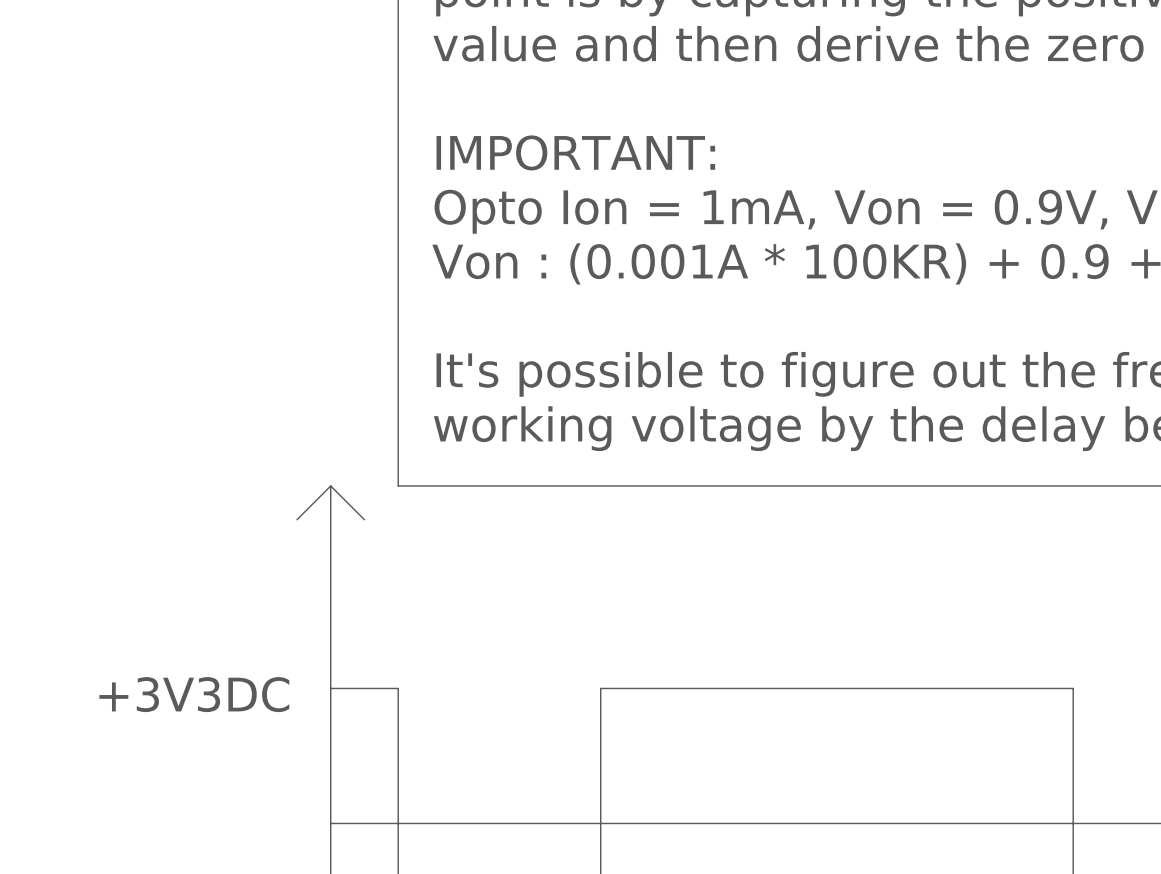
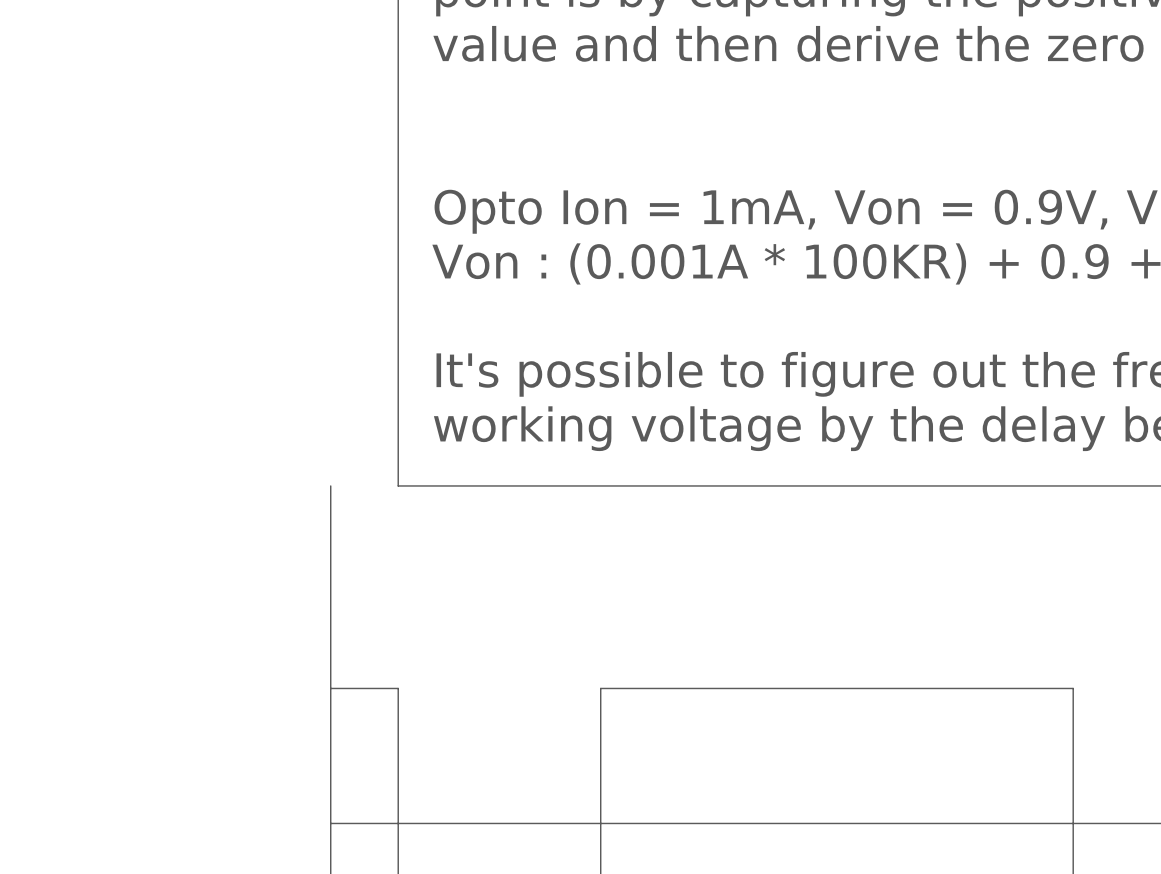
text: IMPORTANT: (575, 152) -> none
line: (296, 519) (330, 485) (364, 519) -> none
text: +3V3DC (194, 694) -> none

